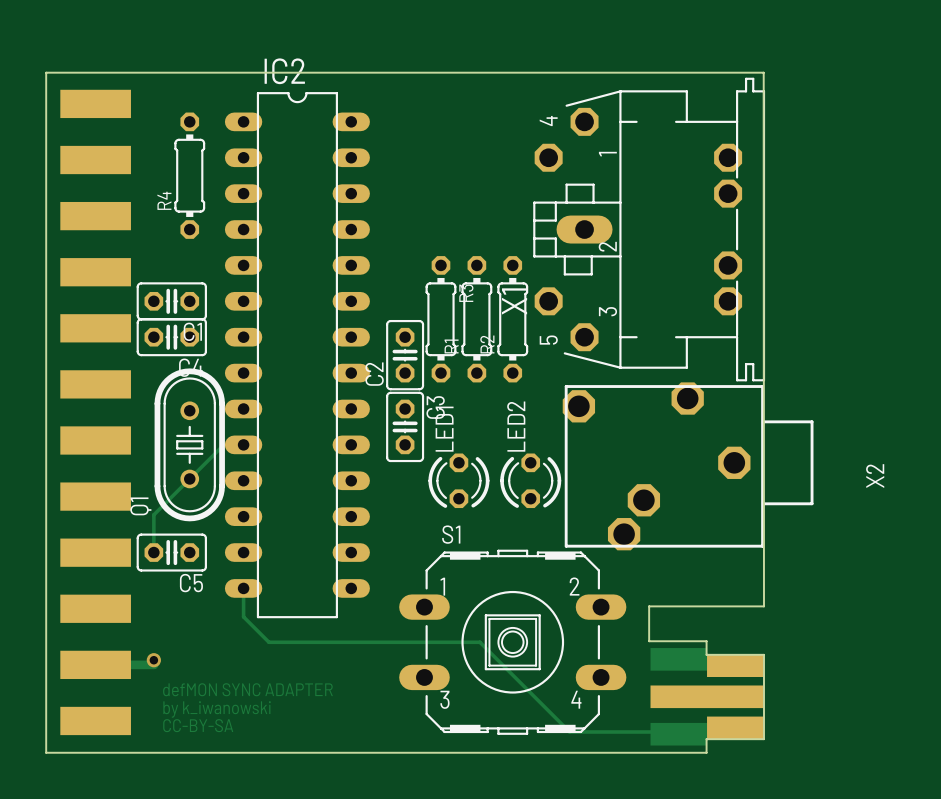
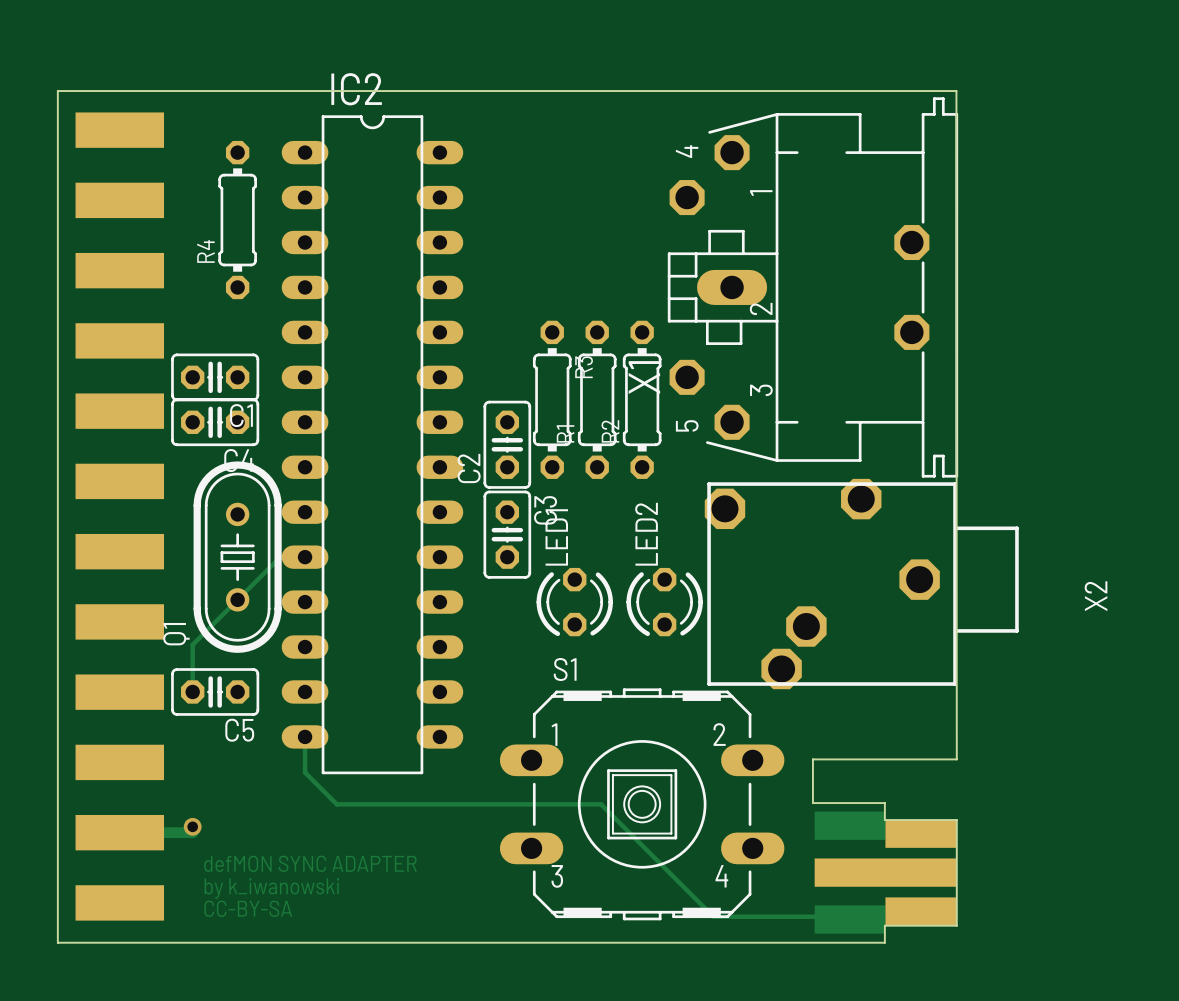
X1 footprint: [533, 77, 766, 382] -> [667, 97, 959, 478]

